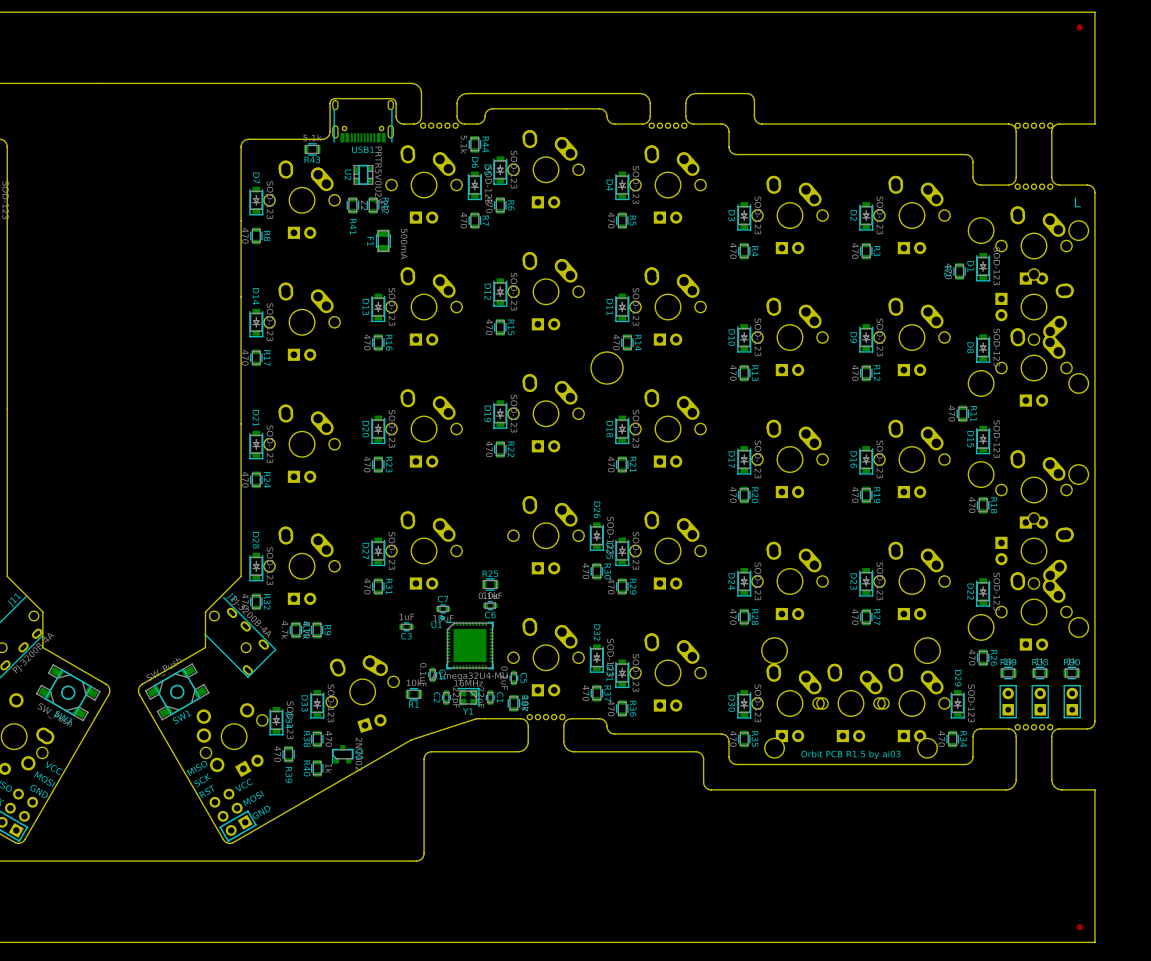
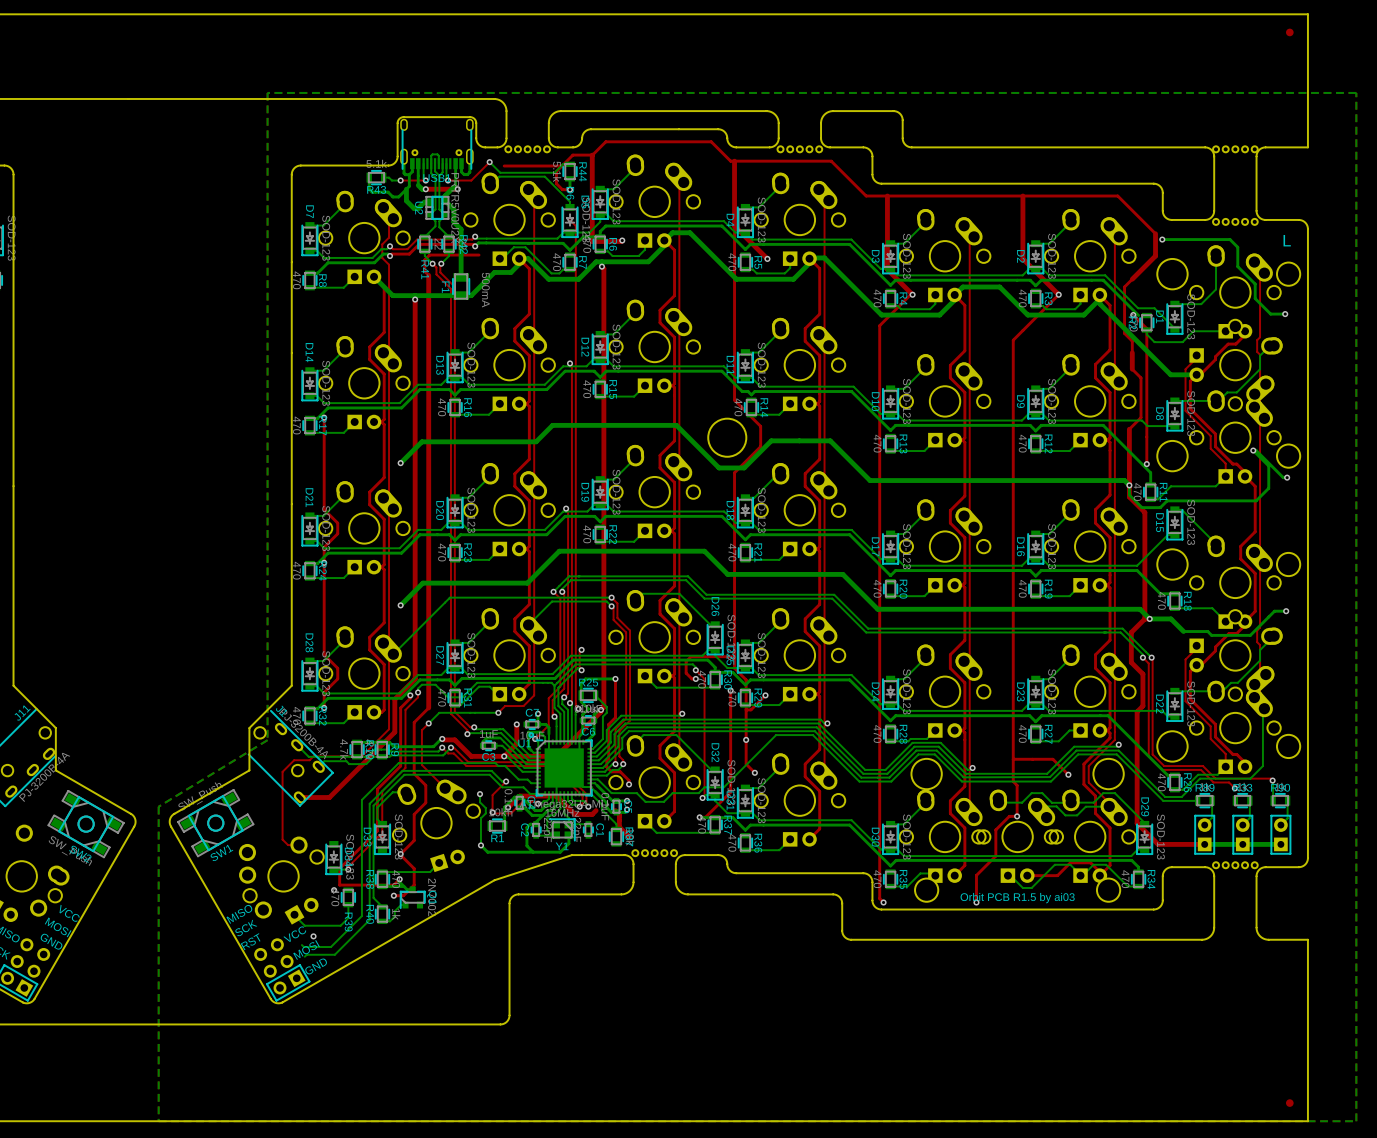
bottom zone outline: none -> (1356, 92) (1356, 1121) (158, 1121) (158, 806) (267, 740) (267, 92) (1356, 92)
top track: none -> (592, 155) (605, 141) (711, 141) (730, 161) (831, 161) (866, 196) (1117, 196) (1155, 233) (1155, 256) (1124, 286) (1124, 333) (1132, 341) (1132, 369) (1141, 377) (1141, 417) (1129, 429) (1129, 496) (1144, 512) (1144, 618)
top track: none -> (592, 155) (572, 155) (556, 171) (556, 183) (562, 189) (570, 189)
top track: none -> (592, 155) (592, 241) (622, 240)
bottom track: none -> (404, 156) (404, 173) (409, 174)
bottom track: none -> (469, 156) (469, 172) (467, 174) (461, 171) (461, 163)
top track: none -> (734, 161) (734, 226)
bottom track: none -> (489, 162) (500, 172) (554, 172) (562, 164) (570, 164)
top track: none -> (489, 162) (471, 180) (448, 180)
via: none -> (489, 162)
bottom track: none -> (412, 163) (412, 171) (409, 174)
bottom track: none -> (418, 163) (418, 185) (422, 189) (425, 189)
bottom track: none -> (423, 163) (423, 178) (425, 180)
bottom track: none -> (435, 163) (435, 171) (439, 175)
bottom track: none -> (438, 163) (438, 155) (432, 154) (431, 173) (435, 177) (435, 209) (429, 215) (435, 221) (435, 226) (424, 236)
bottom track: none -> (442, 163) (442, 172) (439, 175)
bottom track: none -> (446, 163) (448, 180)
bottom track: none -> (455, 163) (455, 185) (445, 195) (445, 200) (453, 209) (453, 222) (461, 229) (461, 277)
top track: none -> (561, 166) (504, 166)
bottom track: none -> (635, 167) (613, 189) (600, 189)
bottom track: none -> (409, 174) (409, 186) (398, 196) (392, 196) (388, 192) (372, 192) (369, 189) (369, 177)
bottom track: none -> (439, 175) (439, 209) (445, 215) (439, 221) (439, 227) (449, 236)
bottom track: none -> (383, 177) (400, 180)
bottom track: none -> (570, 178) (570, 189)
via: none -> (400, 180)
top track: none -> (425, 180) (400, 180)
via: none -> (425, 180)
via: none -> (448, 180)
top track: none -> (683, 182) (679, 186) (679, 323) (683, 327) (679, 331) (679, 468) (683, 472) (679, 477) (679, 613) (683, 617) (679, 622) (679, 758) (683, 763)
bottom track: none -> (490, 185) (499, 176) (544, 176) (570, 201) (570, 207)
bottom track: none -> (780, 185) (759, 207) (745, 207)
bottom track: none -> (406, 189) (406, 200) (414, 208) (418, 208) (424, 202) (429, 202)
via: none -> (425, 189)
top track: none -> (457, 189) (425, 189)
via: none -> (457, 189)
via: none -> (570, 189)
top track: none -> (887, 196) (887, 269) (912, 294) (879, 325) (879, 898) (883, 902)
top track: none -> (1022, 196) (1022, 258) (1058, 294) (1013, 340) (1013, 781) (1017, 785) (1017, 816) (1009, 816) (995, 829) (995, 856) (976, 875) (976, 902)
top track: none -> (538, 200) (534, 204) (534, 341) (538, 345) (534, 350) (534, 486) (538, 490) (534, 495) (534, 631) (538, 636) (534, 640) (534, 695) (523, 706) (505, 706) (498, 712)
top track: none -> (828, 200) (824, 204) (824, 341) (828, 345) (824, 350) (824, 486) (828, 490) (824, 495) (824, 631) (828, 636) (824, 640) (824, 776) (828, 781)
bottom track: none -> (345, 203) (323, 225) (309, 225)
top track: none -> (393, 218) (389, 223) (389, 237) (382, 244) (382, 257) (389, 264) (389, 359) (393, 363) (389, 368) (389, 504) (393, 509) (389, 513) (389, 649) (393, 654) (389, 658) (389, 729) (361, 756) (313, 756) (309, 760) (294, 760) (282, 771) (282, 839) (288, 845) (299, 845)
top track: none -> (570, 220) (575, 226) (575, 706) (578, 708)
bottom track: none -> (925, 221) (904, 243) (890, 243)
bottom track: none -> (1071, 221) (1049, 243) (1035, 243)
top track: none -> (734, 226) (734, 400) (760, 426) (760, 446) (734, 472) (734, 668) (746, 679) (746, 764) (754, 772)
top track: none -> (734, 226) (767, 258)
bottom track: none -> (475, 236) (477, 238) (557, 238) (563, 232) (589, 232) (600, 221) (600, 214) (606, 214) (613, 221) (723, 221) (735, 232) (745, 232) (752, 239) (851, 239) (880, 268) (890, 268) (897, 275) (1022, 275) (1029, 268) (1042, 268) (1049, 275) (1105, 275) (1138, 308) (1154, 308) (1174, 329)
top track: none -> (475, 236) (472, 239) (417, 239) (407, 249) (392, 249) (389, 246)
via: none -> (475, 236)
top track: none -> (974, 236) (969, 241) (969, 377) (974, 382) (969, 386) (969, 522) (974, 527) (969, 531) (969, 668) (974, 672) (969, 676) (969, 813) (974, 817)
top track: none -> (1119, 236) (1114, 241) (1114, 377) (1119, 382) (1114, 386) (1114, 522) (1119, 527) (1114, 531) (1114, 668) (1119, 672) (1114, 676) (1114, 739) (1088, 766) (1088, 782) (1109, 803) (1109, 806)
bottom track: none -> (1162, 239) (1230, 239) (1237, 247) (1237, 266) (1255, 284) (1255, 298) (1270, 314) (1285, 314)
via: none -> (1162, 239)
via: none -> (622, 240)
bottom track: none -> (645, 240) (645, 249) (638, 256) (612, 256) (607, 251) (600, 251)
top track: none -> (664, 240) (674, 250) (674, 295) (660, 310) (660, 322) (674, 337) (674, 383) (672, 385) (674, 387) (674, 440) (660, 455) (660, 467) (674, 482) (674, 527) (671, 530)
bottom track: none -> (389, 246) (387, 249) (381, 249) (372, 257) (324, 257) (316, 250) (309, 250)
via: none -> (389, 246)
bottom track: none -> (475, 246) (478, 242) (563, 243) (570, 250) (583, 236) (600, 236) (600, 231) (605, 226) (721, 226) (745, 249) (750, 244) (849, 244) (890, 285) (895, 280) (1030, 280) (1035, 285) (1041, 280) (1103, 280) (1138, 315)
top track: none -> (475, 246) (473, 244) (419, 244) (409, 254) (391, 254) (389, 256)
via: none -> (475, 246)
bottom track: none -> (424, 251) (424, 256) (432, 263)
bottom track: none -> (449, 251) (449, 256) (441, 263)
bottom track: none -> (1216, 253) (1216, 289) (1201, 304) (1174, 304)
top track: none -> (479, 255) (429, 255) (424, 259) (424, 271) (428, 275) (428, 707) (414, 722) (414, 773) (425, 785) (425, 802) (414, 814) (414, 840) (400, 854) (414, 868) (414, 885) (403, 895) (393, 895)
bottom track: none -> (389, 256) (383, 254) (374, 262) (328, 262) (317, 273) (309, 273)
via: none -> (389, 256)
bottom track: none -> (499, 258) (502, 258) (513, 247) (525, 247) (551, 273) (559, 273) (563, 269) (570, 269)
top track: none -> (519, 258) (529, 268) (529, 314) (514, 328) (514, 341) (529, 355) (529, 401) (526, 403)
via: none -> (767, 258)
bottom track: none -> (790, 258) (790, 268) (784, 273) (756, 273) (752, 269) (745, 269)
top track: none -> (809, 258) (819, 268) (819, 314) (805, 328) (805, 341) (819, 355) (819, 401) (817, 403)
top track: none -> (432, 263) (436, 267) (436, 274) (450, 288) (450, 713) (467, 730) (467, 734)
via: none -> (432, 263)
top track: none -> (441, 263) (440, 272) (454, 286) (454, 711) (470, 727) (474, 727)
via: none -> (441, 263)
top track: none -> (601, 266) (603, 268) (603, 707) (556, 756) (471, 756) (454, 739) (441, 738)
via: none -> (601, 266)
top track: none -> (1264, 273) (1260, 277) (1260, 337) (1257, 340) (1257, 351) (1260, 354) (1260, 414) (1264, 418) (1260, 422) (1260, 559) (1264, 563) (1260, 567) (1260, 627) (1257, 630) (1257, 642) (1260, 645) (1260, 704) (1264, 708)
bottom track: none -> (354, 276) (343, 287) (309, 287)
bottom track: none -> (374, 276) (392, 295) (471, 295) (494, 272) (510, 272) (519, 264) (519, 258) (528, 258) (548, 279) (578, 279) (596, 261) (648, 261) (664, 245) (664, 240) (672, 232) (690, 232) (736, 279) (793, 279) (809, 263) (810, 257) (824, 257) (881, 315) (939, 315) (954, 300) (954, 294) (962, 286) (999, 286) (1027, 315) (1083, 315) (1099, 299)
top track: none -> (374, 276) (384, 286) (384, 332) (369, 346) (369, 359) (384, 374) (384, 419) (381, 421)
bottom track: none -> (1099, 293) (1099, 303) (1170, 374) (1196, 374)
via: none -> (912, 294)
via: none -> (1058, 294)
bottom track: none -> (935, 294) (935, 303) (930, 309) (900, 309) (897, 305) (890, 305)
top track: none -> (954, 294) (964, 305) (964, 350) (950, 365) (950, 377) (964, 392) (964, 437) (962, 440)
bottom track: none -> (1080, 294) (1080, 303) (1075, 309) (1046, 309) (1042, 305) (1035, 305)
top track: none -> (1099, 294) (1110, 305) (1110, 349) (1095, 364) (1095, 377) (1110, 392) (1110, 437) (1107, 440)
top track: none -> (415, 299) (415, 678) (394, 699) (394, 732) (329, 797) (299, 797)
via: none -> (415, 299)
bottom track: none -> (635, 312) (613, 334) (600, 334)
top track: none -> (1133, 315) (1146, 328) (1146, 464)
via: none -> (1133, 315)
via: none -> (1285, 314)
bottom track: none -> (1146, 330) (1146, 334) (1154, 342) (1182, 342) (1193, 331) (1225, 331)
bottom track: none -> (490, 330) (468, 352) (455, 352)
bottom track: none -> (780, 330) (759, 352) (745, 352)
top track: none -> (1245, 331) (1245, 334) (1235, 344) (1228, 344) (1200, 374) (1196, 374) (1190, 381) (1190, 408) (1215, 434) (1215, 446) (1232, 464) (1236, 464) (1245, 472) (1245, 476) (1255, 486) (1255, 531) (1240, 546) (1240, 558) (1255, 573) (1255, 611) (1236, 633) (1229, 633) (1201, 665) (1196, 665) (1190, 671) (1190, 699) (1215, 724) (1215, 737) (1232, 754) (1236, 754) (1245, 762) (1245, 766)
bottom track: none -> (1269, 346) (1260, 355) (1260, 369) (1236, 392) (1227, 392) (1216, 403) (1213, 400) (1174, 400)
bottom track: none -> (345, 348) (323, 370) (309, 370)
top track: none -> (1196, 355) (1196, 358) (1185, 369) (1185, 410) (1210, 436) (1210, 448) (1225, 463) (1225, 476)
top track: none -> (570, 363) (571, 365) (571, 701) (570, 703)
via: none -> (570, 363)
bottom track: none -> (925, 367) (904, 388) (890, 388)
bottom track: none -> (1071, 367) (1049, 388) (1035, 388)
bottom track: none -> (645, 385) (634, 396) (600, 396)
bottom track: none -> (309, 395) (316, 395) (324, 403) (399, 403) (418, 384) (441, 384) (448, 377) (462, 377) (469, 384) (544, 384) (563, 366) (586, 366) (593, 359) (606, 359) (613, 366) (723, 366) (735, 377) (751, 377) (760, 386) (853, 386) (880, 414) (897, 414) (903, 420) (1021, 420) (1028, 414) (1042, 414) (1049, 420) (1141, 420) (1147, 426) (1174, 426)
bottom track: none -> (499, 403) (488, 414) (455, 414)
top track: none -> (526, 403) (529, 406) (529, 459) (514, 473) (514, 486) (529, 500) (529, 546) (526, 549)
bottom track: none -> (790, 403) (779, 414) (751, 414)
top track: none -> (817, 403) (819, 406) (819, 459) (805, 473) (805, 486) (819, 500) (819, 546) (817, 549)
bottom track: none -> (309, 418) (317, 418) (328, 407) (401, 407) (420, 389) (449, 389) (455, 395) (460, 389) (546, 389) (565, 371) (594, 371) (600, 377) (606, 371) (721, 371) (742, 391) (748, 391) (751, 394) (754, 391) (851, 391) (890, 430) (895, 425) (1030, 425) (1035, 430) (1041, 425) (1103, 425) (1150, 472) (1150, 484)
top track: none -> (324, 417) (324, 509) (337, 523) (337, 533) (324, 547) (324, 654) (337, 668) (337, 678) (324, 692) (324, 707)
via: none -> (324, 417)
bottom track: none -> (354, 421) (343, 432) (309, 432)
top track: none -> (381, 421) (384, 424) (384, 477) (369, 492) (369, 504) (384, 519) (384, 564) (381, 567)
bottom track: none -> (935, 440) (924, 451) (890, 451)
top track: none -> (962, 440) (964, 442) (964, 496) (950, 510) (950, 523) (964, 537) (964, 583) (962, 585)
bottom track: none -> (1080, 440) (1069, 451) (1035, 451)
top track: none -> (1107, 440) (1110, 442) (1110, 495) (1095, 509) (1095, 523) (1110, 537) (1110, 582) (1107, 585)
via: none -> (1253, 450)
bottom track: none -> (635, 457) (613, 479) (600, 479)
bottom track: none -> (400, 463) (421, 441) (536, 441) (552, 425) (676, 425) (719, 467) (744, 467) (771, 440) (830, 440) (870, 480) (1124, 480) (1129, 485) (1129, 495) (1141, 507) (1160, 507) (1167, 500) (1256, 500) (1268, 488) (1268, 466) (1253, 450) (1256, 450) (1283, 477) (1287, 477)
via: none -> (400, 463)
via: none -> (1146, 464)
bottom track: none -> (780, 471) (754, 497) (745, 497)
bottom track: none -> (490, 476) (468, 497) (455, 497)
bottom track: none -> (1225, 476) (1215, 486) (1171, 486) (1157, 499) (1150, 499)
via: none -> (1287, 477)
via: none -> (1129, 485)
bottom track: none -> (345, 494) (323, 515) (309, 515)
top track: none -> (566, 508) (568, 510) (568, 693) (564, 697)
via: none -> (566, 508)
bottom track: none -> (1174, 509) (1181, 509) (1216, 544) (1216, 548)
bottom track: none -> (925, 512) (904, 534) (890, 534)
bottom track: none -> (1071, 512) (1049, 534) (1035, 534)
bottom track: none -> (645, 530) (634, 541) (600, 541)
top track: none -> (671, 530) (674, 533) (674, 586) (660, 600) (660, 614) (674, 628) (674, 674) (672, 676)
bottom track: none -> (1174, 534) (1167, 534) (1137, 565) (1049, 565) (1042, 559) (1028, 559) (1021, 565) (903, 565) (897, 559) (880, 559) (851, 529) (758, 529) (751, 522) (735, 522) (724, 511) (613, 511) (606, 504) (594, 504) (587, 511) (563, 511) (544, 529) (468, 529) (461, 522) (448, 522) (441, 529) (418, 529) (399, 548) (324, 548) (316, 541) (309, 541)
bottom track: none -> (499, 549) (488, 559) (455, 559)
top track: none -> (526, 549) (529, 551) (529, 604) (514, 618) (514, 631) (529, 646) (529, 683) (519, 694)
bottom track: none -> (790, 549) (779, 559) (745, 559)
top track: none -> (817, 549) (819, 551) (819, 604) (805, 618) (805, 631) (819, 646) (819, 692) (817, 694)
bottom track: none -> (309, 563) (317, 563) (328, 553) (401, 553) (420, 534) (449, 534) (455, 540) (460, 534) (546, 534) (565, 516) (594, 516) (600, 521) (605, 516) (721, 516) (745, 539) (750, 534) (849, 534) (890, 575) (895, 570) (1030, 570) (1035, 576) (1041, 570) (1137, 570) (1160, 593) (1174, 593)
via: none -> (324, 562)
bottom track: none -> (354, 567) (343, 578) (309, 578)
top track: none -> (381, 567) (384, 569) (384, 622) (369, 637) (369, 649) (384, 664) (384, 709) (381, 712) (374, 712)
bottom track: none -> (935, 585) (924, 596) (890, 596)
top track: none -> (962, 585) (964, 587) (964, 640) (950, 654) (950, 668) (964, 682) (964, 728) (962, 730)
bottom track: none -> (1080, 585) (1069, 596) (1035, 596)
top track: none -> (1107, 585) (1110, 587) (1110, 640) (1095, 654) (1095, 668) (1110, 682) (1110, 727) (1107, 730)
bottom track: none -> (553, 591) (569, 576) (688, 576) (706, 594) (834, 594) (868, 628) (1122, 628) (1151, 657)
top track: none -> (553, 591) (560, 598) (560, 686) (548, 698) (548, 725) (535, 738)
via: none -> (553, 591)
bottom track: none -> (562, 591) (562, 588) (570, 580) (686, 580) (704, 598) (832, 598) (866, 632) (1120, 632) (1142, 654) (1142, 657)
top track: none -> (562, 591) (564, 593) (564, 688) (552, 700) (552, 714) (554, 716)
via: none -> (562, 591)
bottom track: none -> (611, 597) (450, 597) (393, 654)
top track: none -> (611, 597) (617, 603) (617, 617) (630, 630) (630, 720) (619, 731) (619, 756) (623, 760) (623, 764)
via: none -> (611, 597)
bottom track: none -> (635, 598) (640, 593) (679, 593) (710, 624) (715, 624)
bottom track: none -> (400, 605) (422, 583) (527, 583) (559, 551) (704, 551) (727, 574) (842, 574) (877, 609) (1140, 609) (1149, 618) (1171, 618) (1183, 631) (1207, 631) (1211, 635) (1250, 635) (1274, 611) (1286, 611)
via: none -> (400, 605)
bottom track: none -> (611, 606) (606, 601) (552, 601) (528, 624)
top track: none -> (611, 606) (613, 608) (613, 619) (626, 632) (626, 718) (615, 729) (615, 764)
via: none -> (611, 606)
bottom track: none -> (1174, 608) (1212, 608) (1225, 621)
via: none -> (1286, 611)
top track: none -> (1144, 618) (1131, 632) (1131, 662) (1142, 674) (1142, 706) (1137, 711) (1137, 823) (1158, 844) (1204, 844)
via: none -> (1149, 618)
bottom track: none -> (490, 621) (468, 642) (455, 642)
bottom track: none -> (780, 621) (759, 642) (745, 642)
bottom track: none -> (1274, 636) (1260, 650) (1260, 660) (1237, 682) (1231, 682) (1220, 693) (1216, 693)
bottom track: none -> (345, 639) (323, 661) (309, 661)
top track: none -> (1196, 645) (1196, 648) (1185, 659) (1185, 701) (1210, 726) (1210, 738) (1225, 753) (1225, 766)
top track: none -> (581, 649) (579, 651) (579, 668) (581, 670)
via: none -> (581, 649)
top track: none -> (734, 656) (690, 656) (686, 661) (686, 673) (691, 678) (695, 678)
bottom track: none -> (925, 657) (904, 679) (890, 679)
bottom track: none -> (1071, 657) (1049, 679) (1035, 679)
top track: none -> (1142, 657) (1148, 663) (1148, 756) (1162, 769) (1201, 769) (1213, 782) (1229, 782) (1234, 788)
via: none -> (1142, 657)
top track: none -> (1151, 657) (1152, 754) (1164, 766) (1202, 766) (1215, 778) (1270, 778) (1272, 780)
via: none -> (1151, 657)
bottom track: none -> (581, 670) (577, 668) (558, 687) (558, 706) (564, 711) (564, 742)
via: none -> (581, 670)
bottom track: none -> (695, 670) (692, 664) (575, 664) (554, 685)
top track: none -> (695, 670) (704, 678) (704, 796) (702, 797)
via: none -> (695, 670)
bottom track: none -> (645, 676) (656, 687) (715, 686)
top track: none -> (672, 676) (674, 677) (674, 731) (660, 745) (660, 758) (674, 772) (674, 811) (664, 821)
bottom track: none -> (615, 678) (585, 678) (581, 683) (581, 701) (588, 708) (582, 714) (582, 733) (579, 736) (579, 761) (566, 774) (566, 781)
top track: none -> (615, 678) (615, 717) (608, 724) (608, 758) (606, 767) (611, 771) (620, 771) (629, 780) (629, 784)
via: none -> (615, 678)
via: none -> (695, 678)
bottom track: none -> (309, 686) (316, 686) (324, 693) (399, 693) (418, 675) (441, 675) (448, 668) (461, 668) (467, 674) (552, 674) (570, 655) (702, 655) (708, 649) (715, 649) (715, 655) (727, 668) (751, 668) (758, 675) (851, 675) (880, 704) (897, 704) (903, 710) (1021, 710) (1028, 704) (1042, 704) (1049, 710) (1162, 710) (1167, 716) (1174, 716)
bottom track: none -> (554, 685) (551, 682) (477, 682) (462, 697) (448, 697) (435, 684) (421, 684) (418, 688) (418, 692)
bottom track: none -> (554, 685) (554, 707) (560, 713) (560, 742)
bottom track: none -> (1216, 689) (1214, 691) (1174, 691)
top track: none -> (730, 690) (730, 792) (705, 817) (699, 817)
via: none -> (730, 690)
top track: none -> (418, 692) (418, 697) (405, 709) (405, 767) (382, 791) (382, 836) (378, 836) (348, 866) (348, 869)
via: none -> (418, 692)
bottom track: none -> (499, 694) (497, 694) (489, 686) (479, 686) (460, 705) (455, 705)
bottom track: none -> (790, 694) (779, 705) (745, 705)
top track: none -> (817, 694) (819, 696) (819, 749) (805, 764) (805, 776) (819, 791) (819, 828) (809, 839)
top track: none -> (410, 695) (410, 698) (400, 707) (400, 766) (377, 789) (377, 830) (339, 868) (339, 885) (393, 885) (399, 879)
via: none -> (410, 695)
bottom track: none -> (595, 695) (606, 707) (606, 712) (602, 716) (602, 738) (592, 748) (590, 748)
top track: none -> (765, 695) (750, 709) (746, 709)
via: none -> (765, 695)
bottom track: none -> (564, 697) (562, 704) (568, 709) (568, 742)
via: none -> (564, 697)
bottom track: none -> (570, 703) (571, 704) (571, 742)
via: none -> (570, 703)
bottom track: none -> (309, 708) (317, 708) (328, 698) (401, 698) (420, 679) (449, 679) (455, 685) (462, 678) (555, 678) (573, 660) (707, 660) (715, 667) (715, 672) (732, 672) (745, 684) (750, 679) (849, 679) (890, 720) (895, 715) (1029, 715) (1035, 721) (1041, 715) (1108, 715) (1167, 775) (1174, 775)
via: none -> (324, 707)
bottom track: none -> (578, 708) (575, 712) (575, 742)
via: none -> (578, 708)
bottom track: none -> (1264, 708) (1262, 766) (1250, 778) (1200, 778) (1181, 797) (1165, 797) (1118, 750) (1076, 750) (1050, 777) (969, 777) (963, 777) (936, 750) (916, 750) (889, 777) (861, 777) (814, 731) (629, 731) (622, 737) (622, 748) (602, 767) (590, 767)
bottom track: none -> (600, 709) (594, 714) (594, 734) (586, 742) (583, 742)
via: none -> (600, 709)
bottom track: none -> (354, 712) (343, 723) (309, 723)
bottom track: none -> (498, 712) (439, 712) (428, 723)
via: none -> (498, 712)
bottom track: none -> (537, 713) (537, 724) (545, 724) (548, 727) (548, 760) (545, 764)
via: none -> (538, 713)
bottom track: none -> (682, 713) (680, 715) (621, 715) (606, 730) (606, 740) (594, 752) (590, 752)
via: none -> (682, 713)
bottom track: none -> (554, 716) (556, 718) (556, 742)
via: none -> (554, 716)
top track: none -> (428, 723) (421, 730) (421, 765) (445, 788)
via: none -> (428, 723)
top track: none -> (516, 724) (516, 743) (504, 756)
via: none -> (516, 724)
bottom track: none -> (827, 723) (820, 719) (623, 719) (610, 732) (610, 742) (596, 756) (590, 756)
via: none -> (827, 723)
bottom track: none -> (474, 727) (476, 729) (503, 729) (530, 756) (538, 756)
via: none -> (474, 727)
bottom track: none -> (935, 730) (926, 738) (890, 741)
top track: none -> (962, 730) (964, 732) (964, 786) (950, 800) (950, 813) (964, 827) (964, 865) (954, 875)
bottom track: none -> (1080, 730) (1069, 730) (1058, 741) (1035, 741)
top track: none -> (1107, 730) (1110, 733) (1110, 737) (1083, 764) (1083, 784) (1095, 796) (1095, 813) (1110, 827) (1110, 865) (1099, 875) (1099, 872) (1090, 862) (1070, 862) (1057, 875) (1027, 875)
bottom track: none -> (467, 734) (501, 733) (528, 760) (538, 760)
via: none -> (467, 734)
bottom track: none -> (442, 738) (433, 746) (393, 746) (389, 742) (357, 742)
via: none -> (442, 738)
bottom track: none -> (535, 738) (538, 742) (538, 748)
via: none -> (535, 738)
via: none -> (746, 739)
bottom track: none -> (545, 742) (545, 737) (540, 732) (528, 732) (528, 747) (533, 752) (538, 752)
bottom track: none -> (297, 745) (308, 756) (367, 756) (374, 749) (438, 751) (442, 747)
bottom track: none -> (482, 745) (482, 741) (486, 737) (500, 737) (526, 764) (549, 764) (556, 771) (556, 805) (551, 810) (547, 810) (536, 824) (530, 824) (526, 827) (526, 845) (533, 852)
bottom track: none -> (494, 745) (502, 745) (524, 767) (538, 767)
bottom track: none -> (1118, 744) (1116, 746) (1074, 746) (1047, 773) (965, 773) (938, 746) (914, 746) (887, 773) (863, 773) (816, 727) (627, 727) (618, 736) (618, 746) (600, 764) (590, 764)
via: none -> (1118, 744)
top track: none -> (442, 747) (448, 753) (453, 753) (466, 766) (552, 766) (582, 796) (582, 803) (579, 806)
via: none -> (442, 747)
bottom track: none -> (450, 747) (443, 755) (373, 756) (366, 764) (349, 764) (346, 761) (324, 761) (318, 766)
top track: none -> (450, 747) (453, 747) (468, 762) (554, 762) (586, 794) (588, 806)
via: none -> (450, 747)
bottom track: none -> (635, 748) (635, 742) (643, 735) (676, 735) (711, 769) (715, 769)
bottom track: none -> (504, 756) (507, 756) (522, 771) (538, 771)
via: none -> (504, 756)
top track: none -> (1013, 759) (1052, 759) (1068, 774)
bottom track: none -> (590, 760) (598, 760) (614, 744) (614, 734) (625, 723) (818, 723) (865, 769) (885, 769) (912, 742) (940, 742) (967, 769) (972, 767)
bottom track: none -> (615, 764) (612, 764) (604, 771) (590, 771)
via: none -> (615, 764)
bottom track: none -> (623, 764) (618, 769) (612, 769) (606, 775) (590, 775)
via: none -> (623, 764)
bottom track: none -> (780, 766) (759, 788) (745, 788)
bottom track: none -> (1225, 766) (1217, 774) (1198, 774) (1183, 789) (1174, 789)
via: none -> (972, 767)
via: none -> (754, 772)
via: none -> (1068, 774)
bottom track: none -> (590, 779) (597, 779) (611, 793) (636, 793) (645, 801) (663, 801) (672, 793) (698, 793) (704, 787) (723, 787) (776, 735) (812, 735) (859, 781) (891, 781) (918, 754) (934, 754) (961, 781) (1051, 781) (1078, 754) (1116, 754) (1163, 800) (1197, 800)
bottom track: none -> (506, 781) (502, 781) (491, 770) (402, 770) (369, 803) (369, 919) (334, 954) (306, 954) (304, 956)
top track: none -> (506, 781) (492, 795) (493, 813) (510, 813) (522, 801) (535, 801) (538, 803)
via: none -> (506, 781)
bottom track: none -> (556, 781) (577, 781) (583, 787) (590, 787) (606, 802) (606, 807) (611, 812) (625, 812) (627, 809)
bottom track: none -> (1272, 780) (1273, 800)
via: none -> (1272, 780)
bottom track: none -> (538, 783) (531, 783) (527, 779) (518, 779) (505, 766) (498, 766) (495, 763) (398, 763) (361, 799) (361, 916) (330, 947) (303, 947) (301, 945)
bottom track: none -> (590, 783) (594, 783) (612, 800) (627, 800)
via: none -> (629, 784)
via: none -> (1234, 788)
bottom track: none -> (406, 792) (392, 792) (377, 807) (377, 819) (382, 824)
bottom track: none -> (480, 794) (480, 802) (485, 808) (485, 813) (480, 818) (480, 845) (487, 852) (560, 852) (568, 843) (568, 835)
via: none -> (480, 794)
bottom track: none -> (545, 793) (530, 793) (523, 787) (502, 787) (489, 774) (404, 774) (373, 805) (373, 897) (382, 906)
bottom track: none -> (548, 793) (546, 800) (538, 803)
bottom track: none -> (552, 793) (552, 801) (540, 810) (535, 810) (521, 797) (514, 797) (504, 807) (504, 826)
bottom track: none -> (560, 793) (560, 808) (547, 818) (547, 830) (552, 835) (555, 835) (536, 835)
bottom track: none -> (564, 793) (564, 813) (568, 818) (568, 824) (588, 824)
bottom track: none -> (568, 793) (568, 800) (571, 804) (579, 806)
bottom track: none -> (571, 793) (573, 800) (583, 800) (588, 806)
bottom track: none -> (583, 793) (591, 793) (601, 804) (601, 809) (616, 824) (616, 829)
bottom track: none -> (702, 797) (705, 795) (715, 795) (715, 800) (727, 813) (752, 813) (759, 820) (851, 820) (880, 849) (897, 849) (903, 856) (1131, 856) (1137, 849) (1144, 849)
via: none -> (702, 797)
bottom track: none -> (1070, 798) (1066, 802) (1051, 802) (1042, 793) (1031, 793) (1022, 802) (998, 802)
bottom track: none -> (1212, 800) (1212, 817) (1204, 825)
bottom track: none -> (1249, 800) (1249, 818) (1242, 825)
bottom track: none -> (1287, 800) (1287, 818) (1280, 825)
via: none -> (627, 800)
bottom track: none -> (925, 802) (904, 824) (890, 824)
bottom track: none -> (1071, 802) (1093, 802) (1103, 793) (1114, 793) (1144, 824)
via: none -> (538, 803)
bottom track: none -> (1036, 806) (1056, 806) (1065, 815) (1077, 815) (1085, 806) (1108, 806) (1119, 817)
top track: none -> (508, 807) (519, 796) (556, 796) (574, 814) (592, 814) (596, 810)
via: none -> (508, 807)
via: none -> (579, 806)
via: none -> (588, 806)
bottom track: none -> (519, 808) (525, 808) (532, 815) (542, 815)
via: none -> (627, 809)
top track: none -> (615, 810) (619, 814) (619, 827) (629, 836)
via: none -> (492, 812)
via: none -> (1017, 816)
bottom track: none -> (699, 817) (732, 817) (745, 830) (750, 825) (849, 825) (890, 865) (896, 860) (1131, 860) (1138, 867) (1138, 872)
via: none -> (699, 817)
bottom track: none -> (645, 821) (656, 832) (715, 832)
bottom track: none -> (790, 839) (779, 850) (745, 850)
bottom track: none -> (1280, 844) (1204, 844)
via: none -> (480, 845)
via: none -> (400, 854)
bottom track: none -> (439, 862) (430, 872) (382, 872)
bottom track: none -> (348, 869) (333, 869)
via: none -> (348, 869)
bottom track: none -> (935, 875) (933, 873) (920, 873) (907, 886) (890, 886)
bottom track: none -> (1007, 875) (1010, 875) (1022, 887) (1031, 887) (1054, 864) (1070, 864) (1080, 875) (1093, 864) (1106, 864) (1127, 886) (1138, 886)
bottom track: none -> (399, 879) (398, 881) (407, 889) (412, 889)
via: none -> (399, 879)
bottom track: none -> (404, 886) (382, 886)
via: none -> (334, 890)
via: none -> (393, 895)
via: none -> (883, 902)
via: none -> (976, 902)
bottom track: none -> (348, 904) (348, 917) (340, 925) (304, 925) (294, 914)
bottom track: none -> (405, 905) (401, 905) (394, 911) (394, 916) (389, 921) (382, 921)
via: none -> (313, 936)

